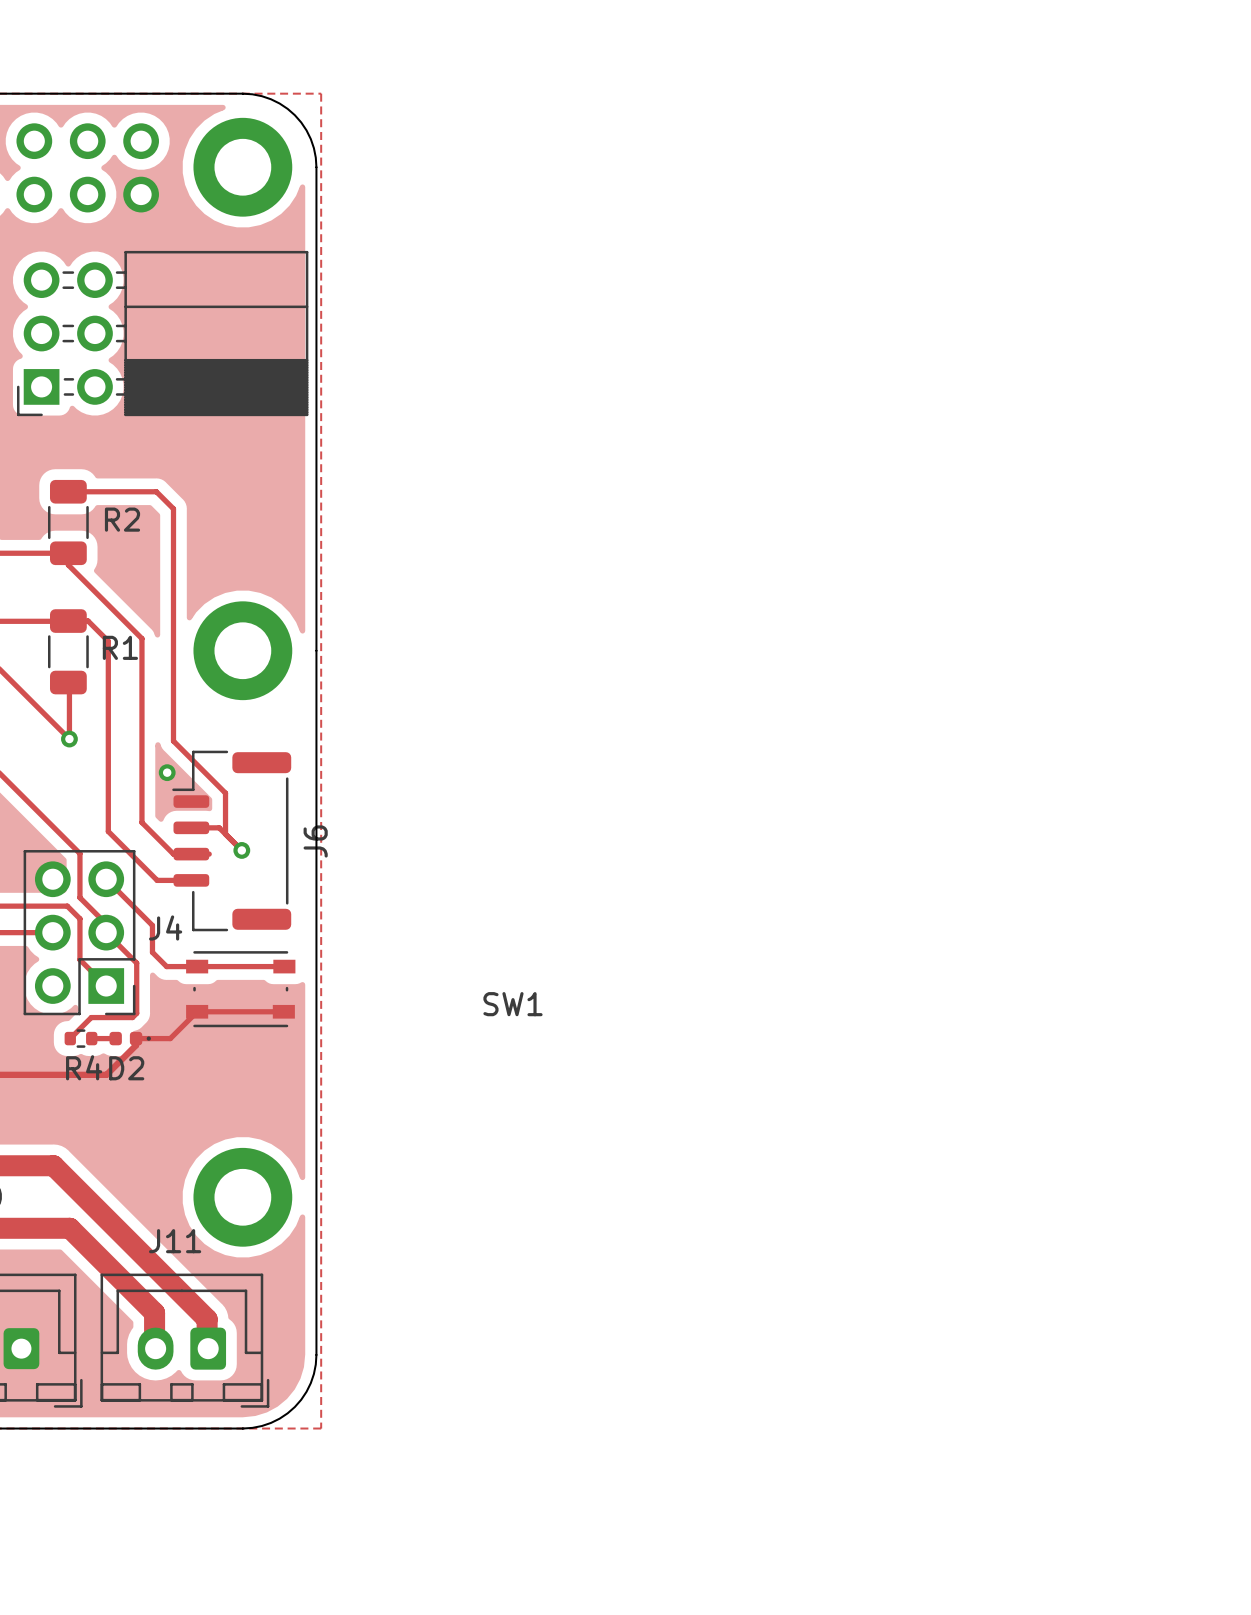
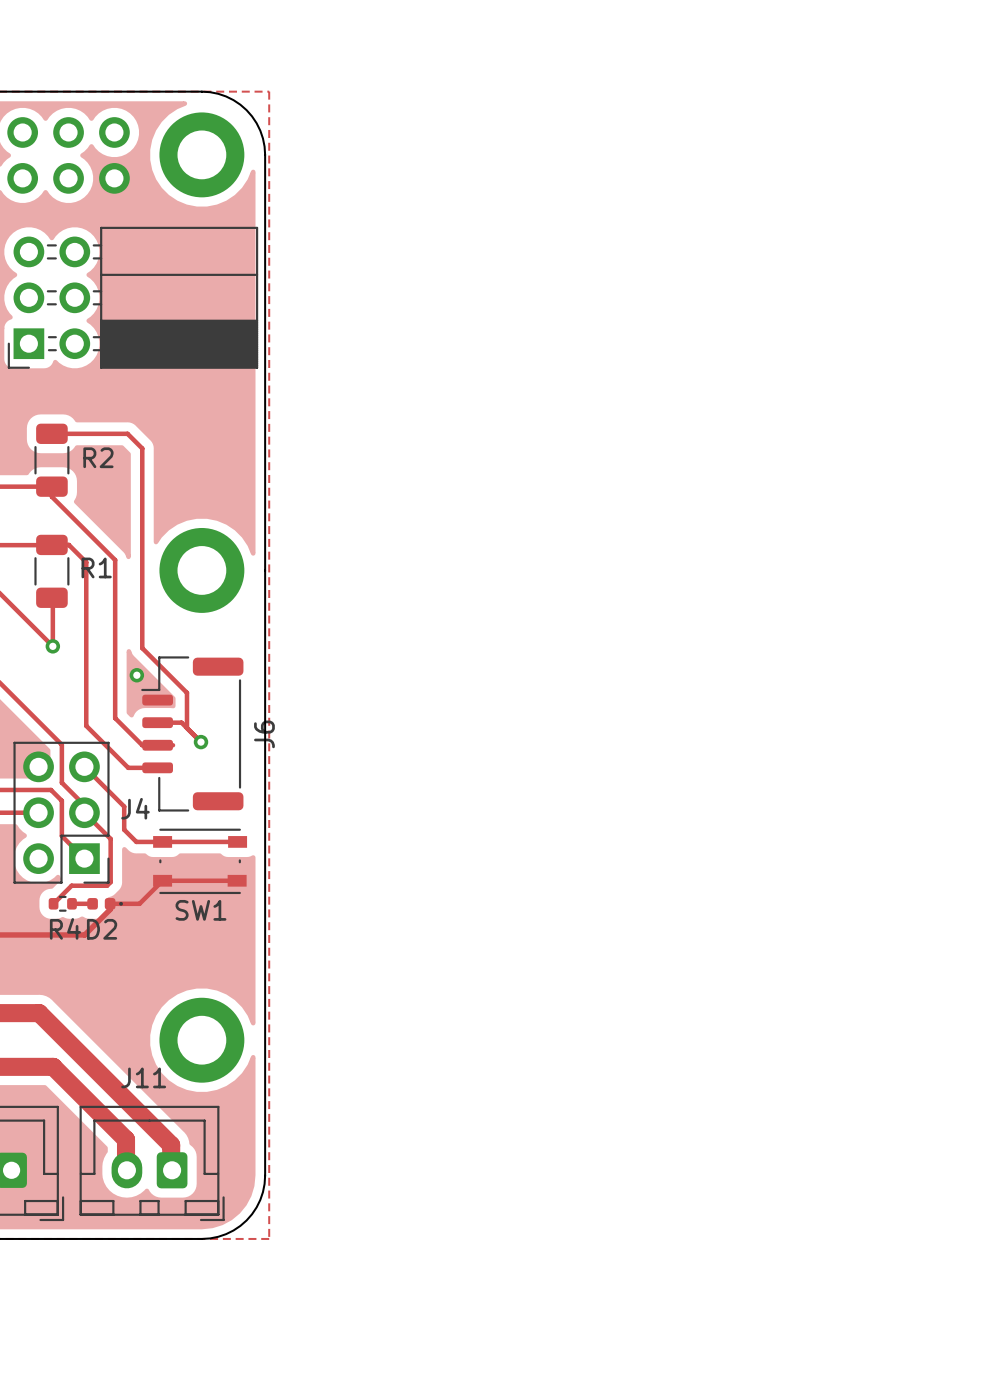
SW1 name position: SW1 (512, 1004) -> SW1 (200, 910)

